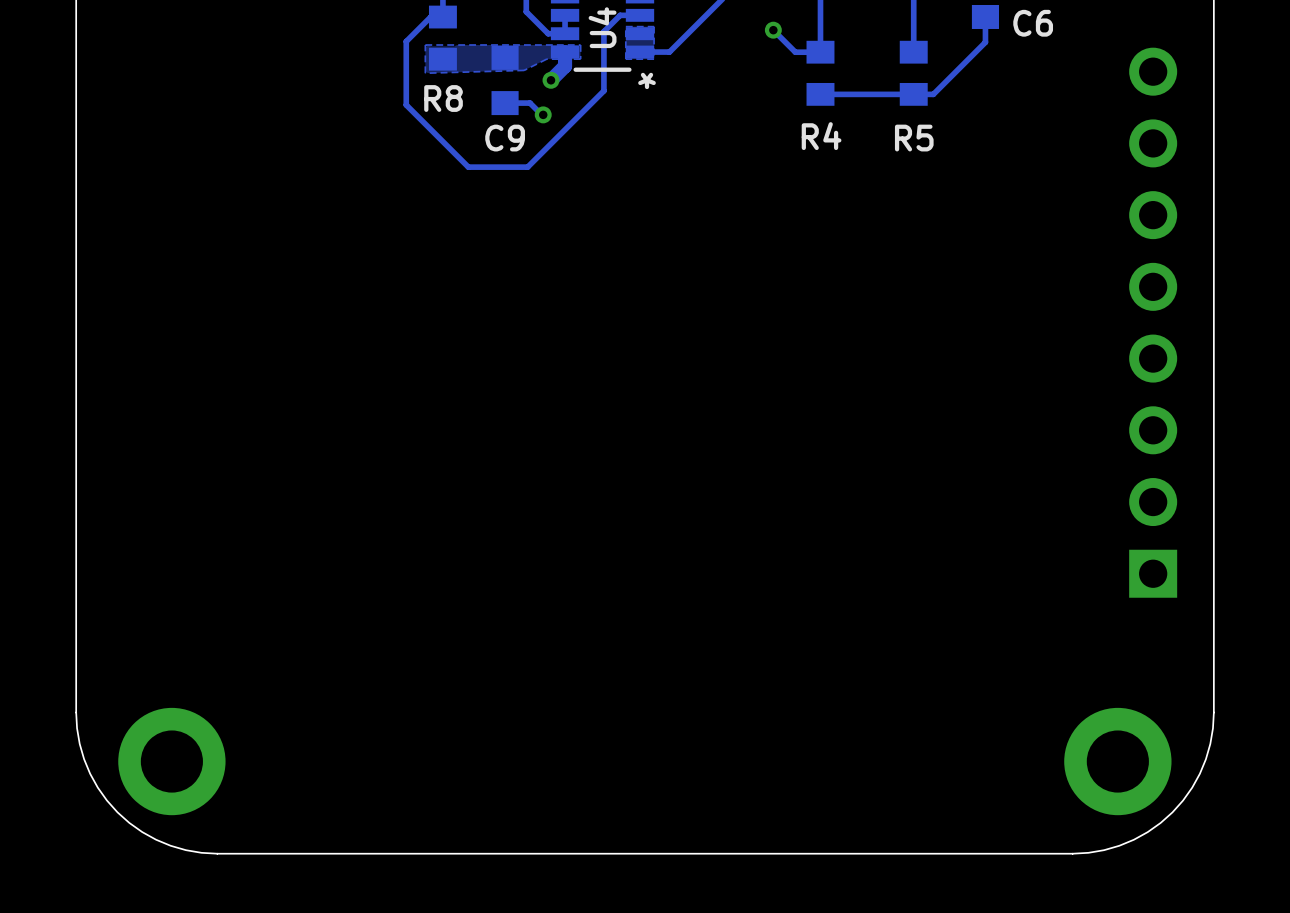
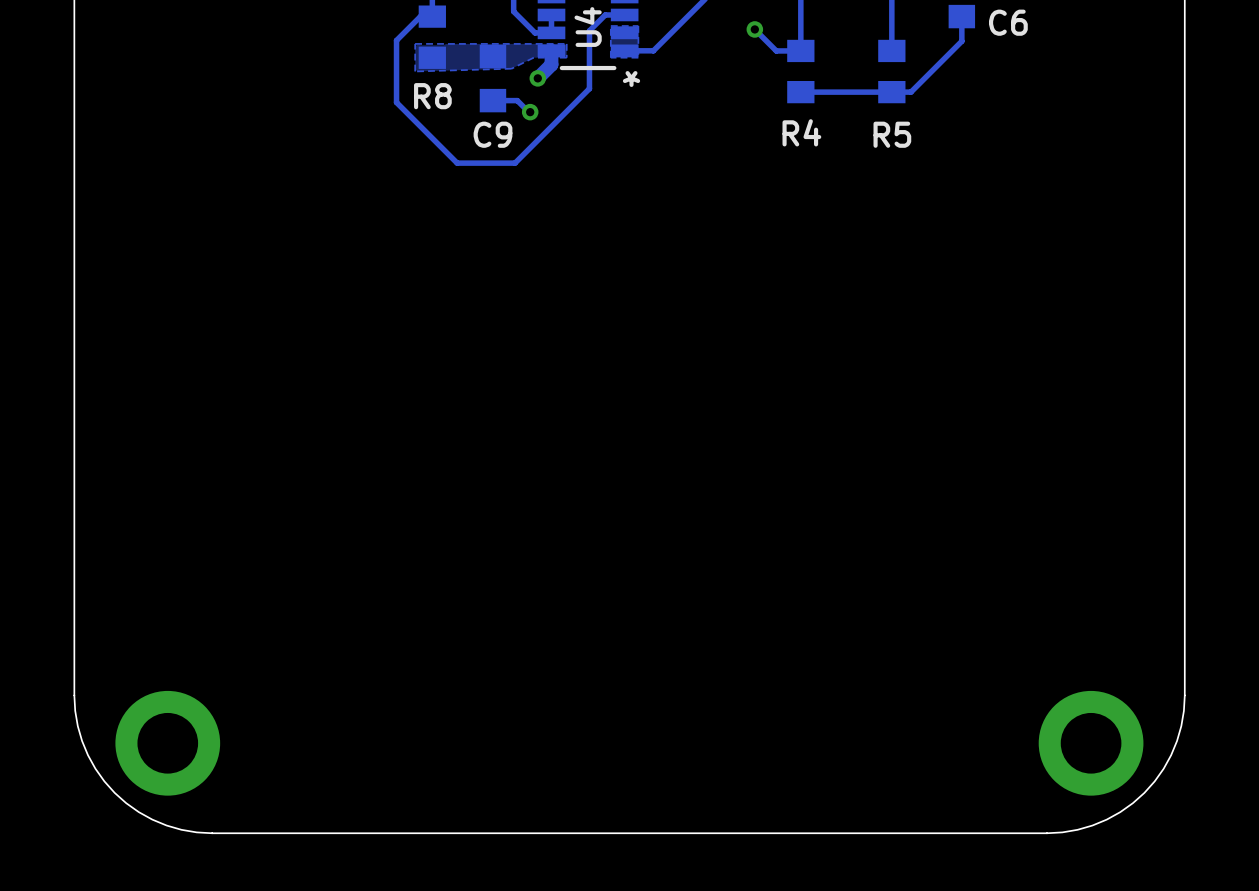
part: (1153, 322) -> none

